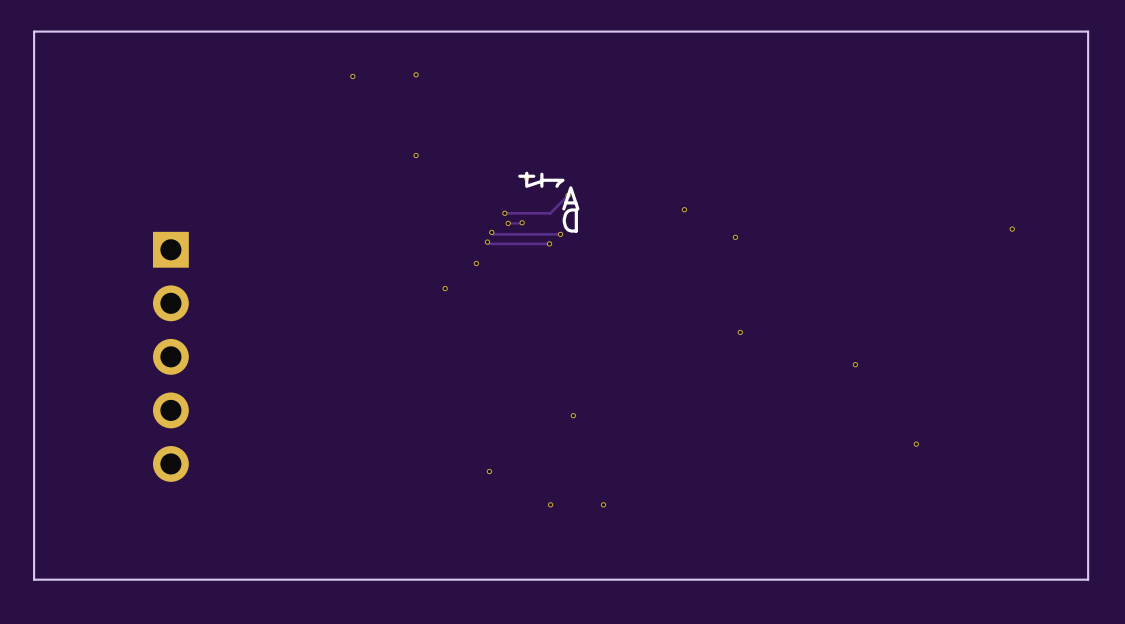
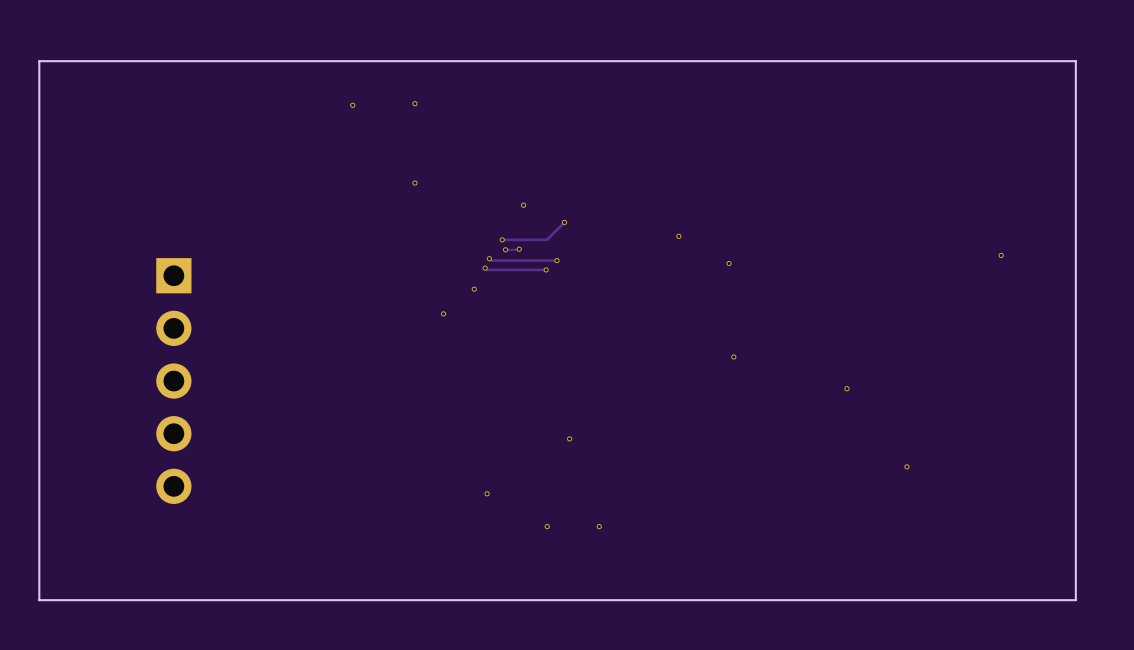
part: (548, 202) -> none

